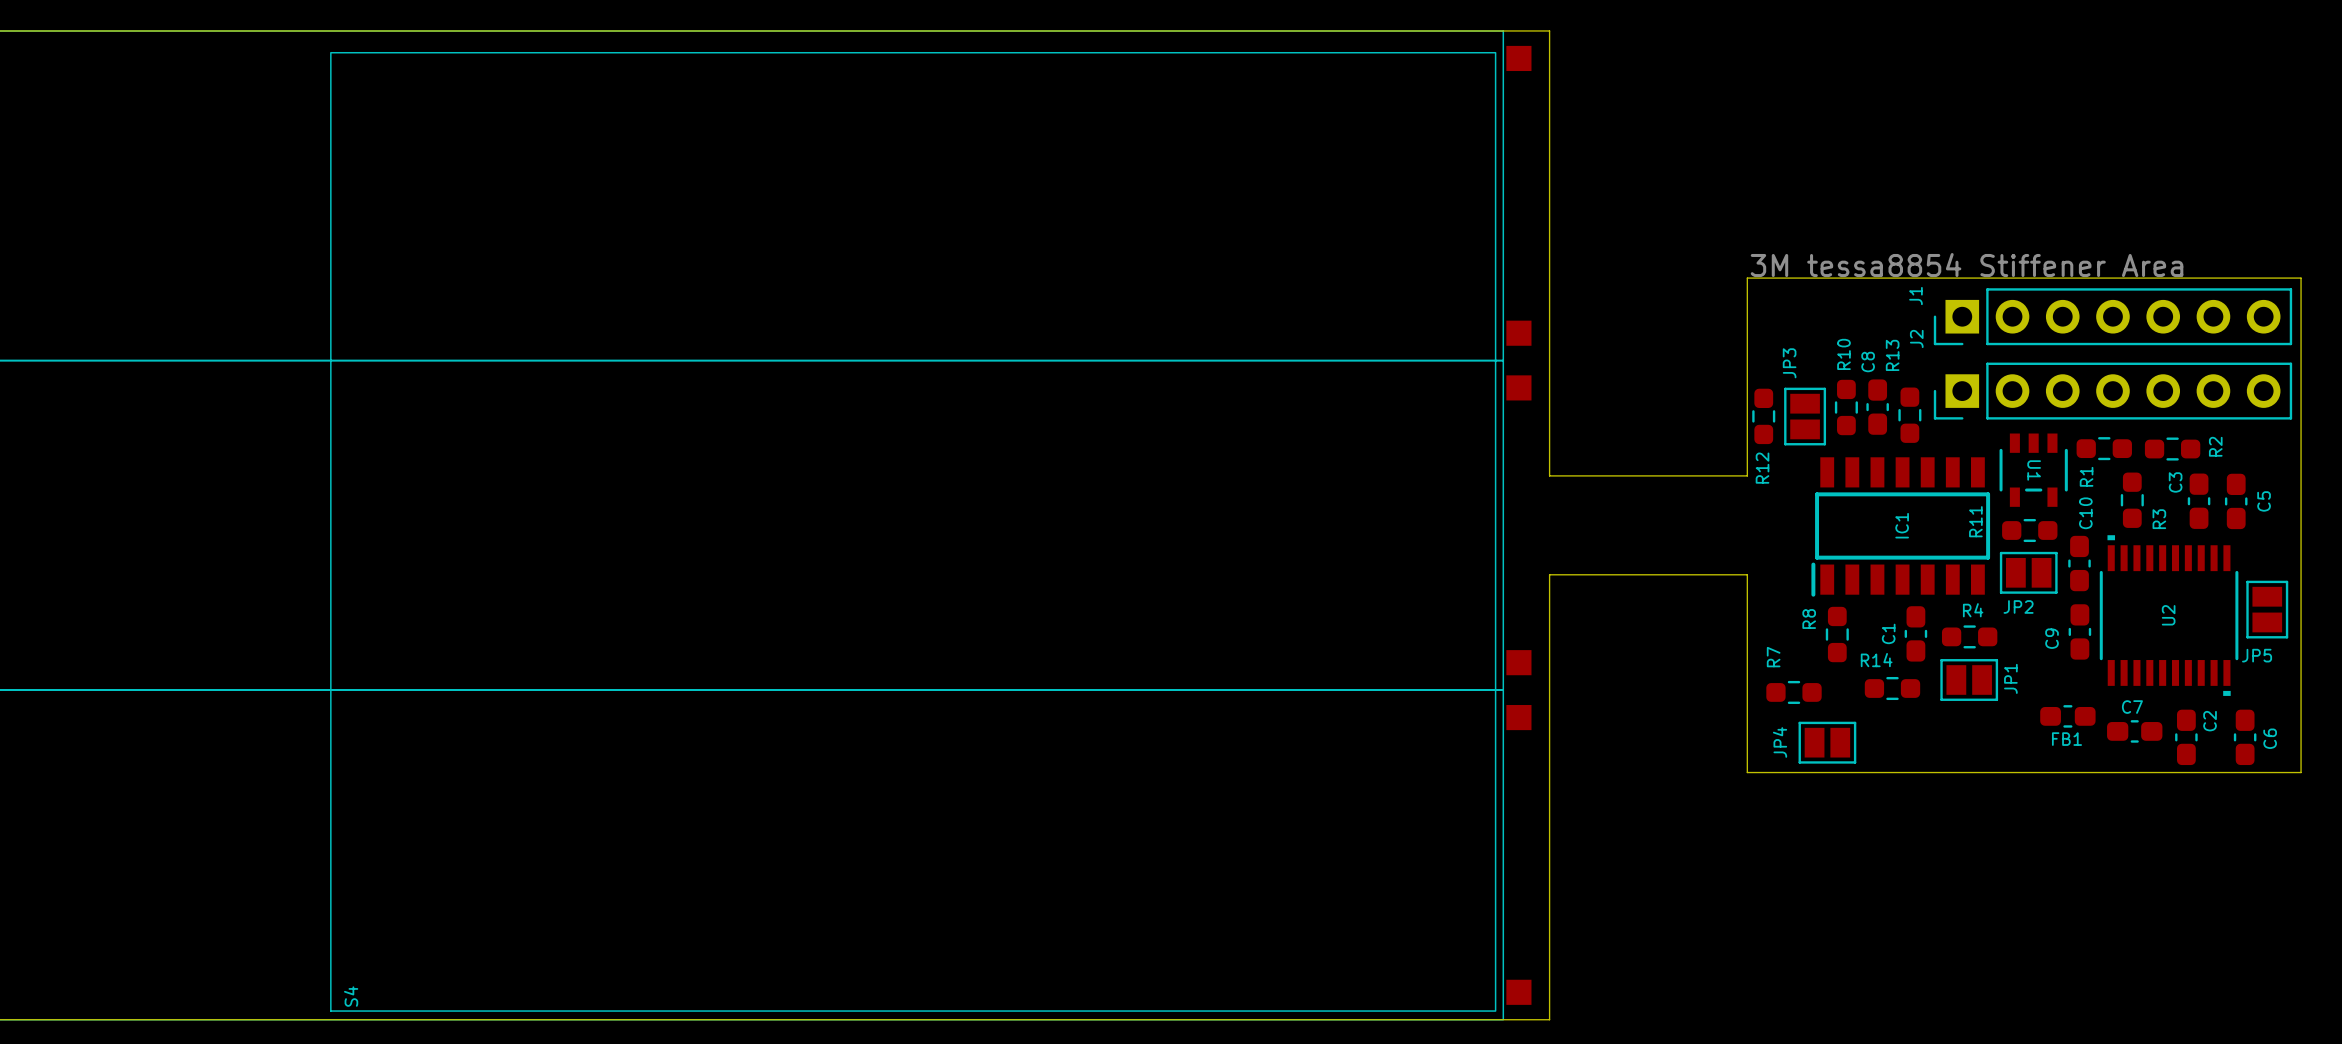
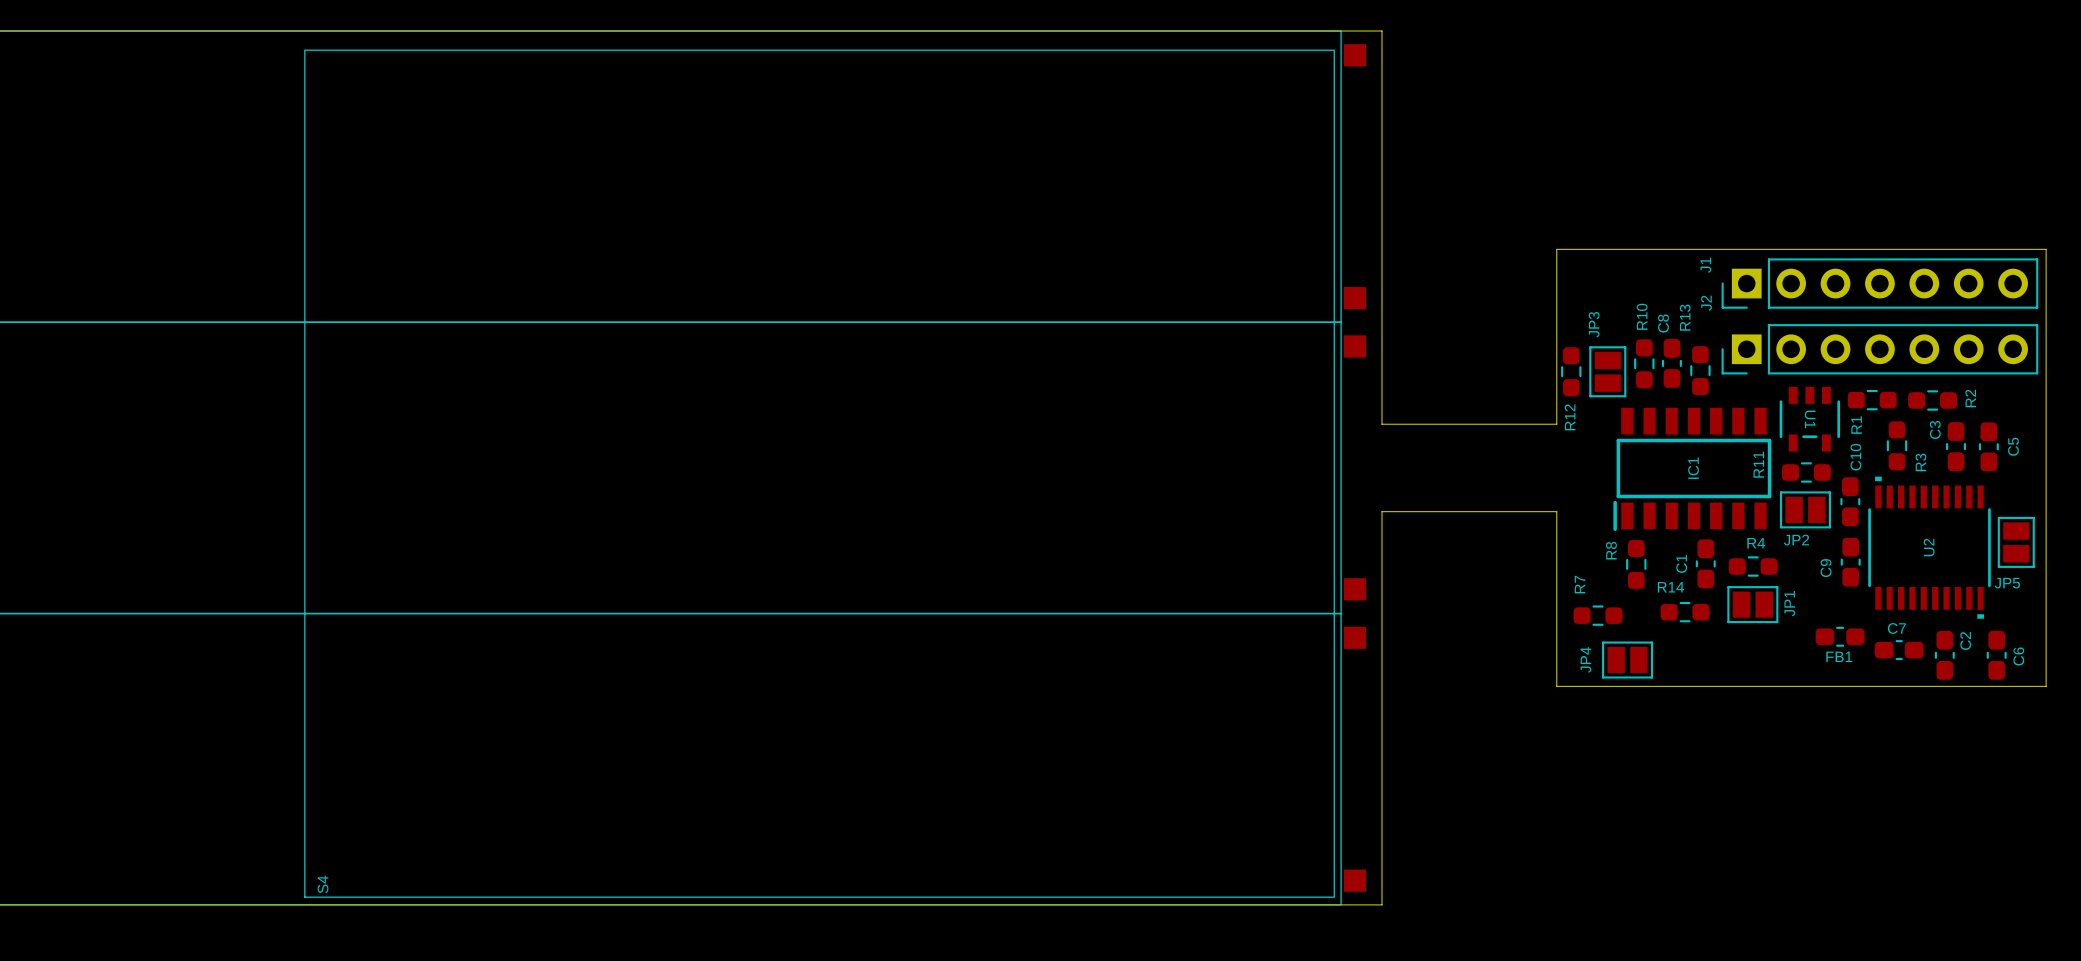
text: 3M tessa8854 Stiffener Area (1967, 265) -> none

